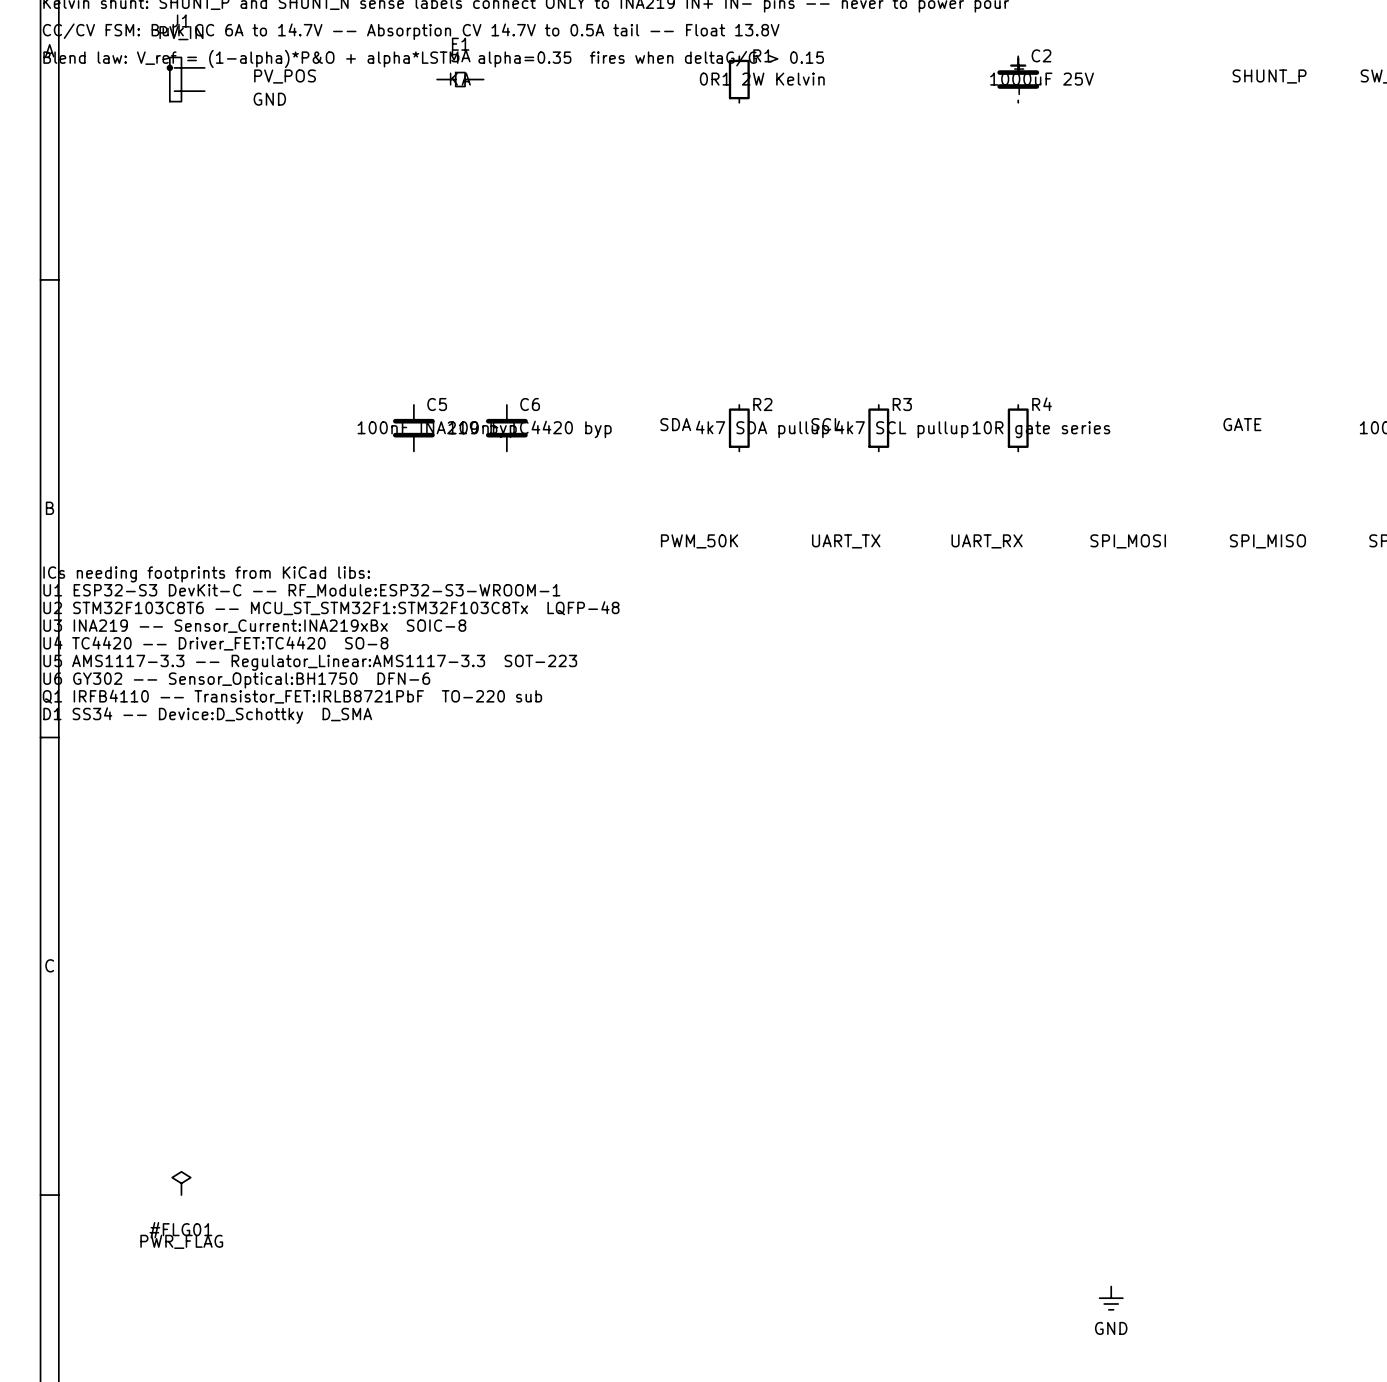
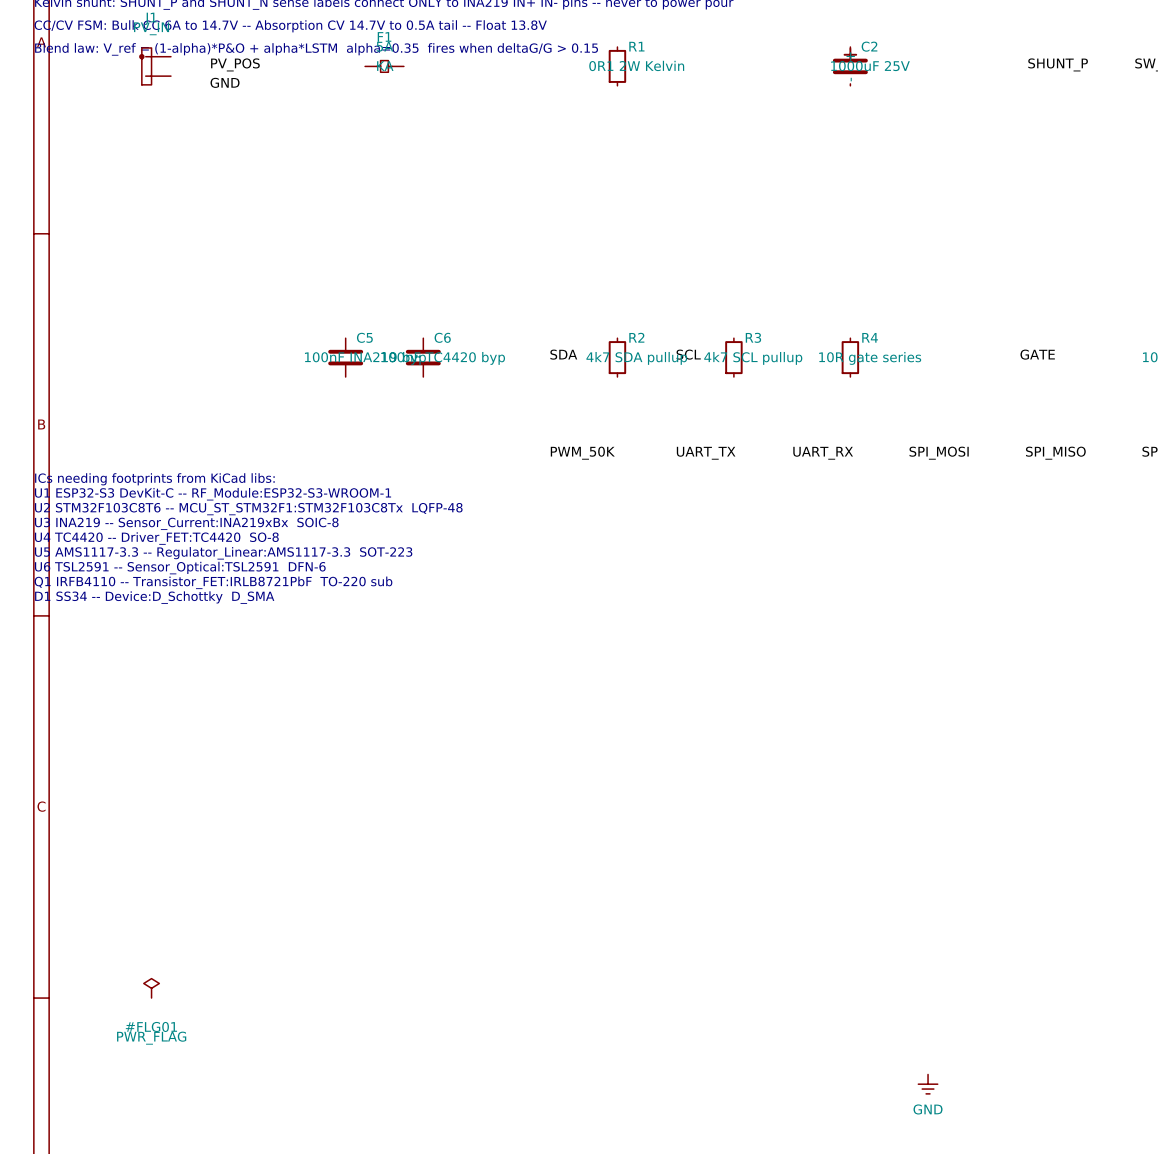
text: U6 GY302 -- Sensor_Optical:BH1750 DFN-6 (236, 680) -> U6 TSL2591 -- Sensor_Optical:TSL2591 DFN-6 (180, 568)

